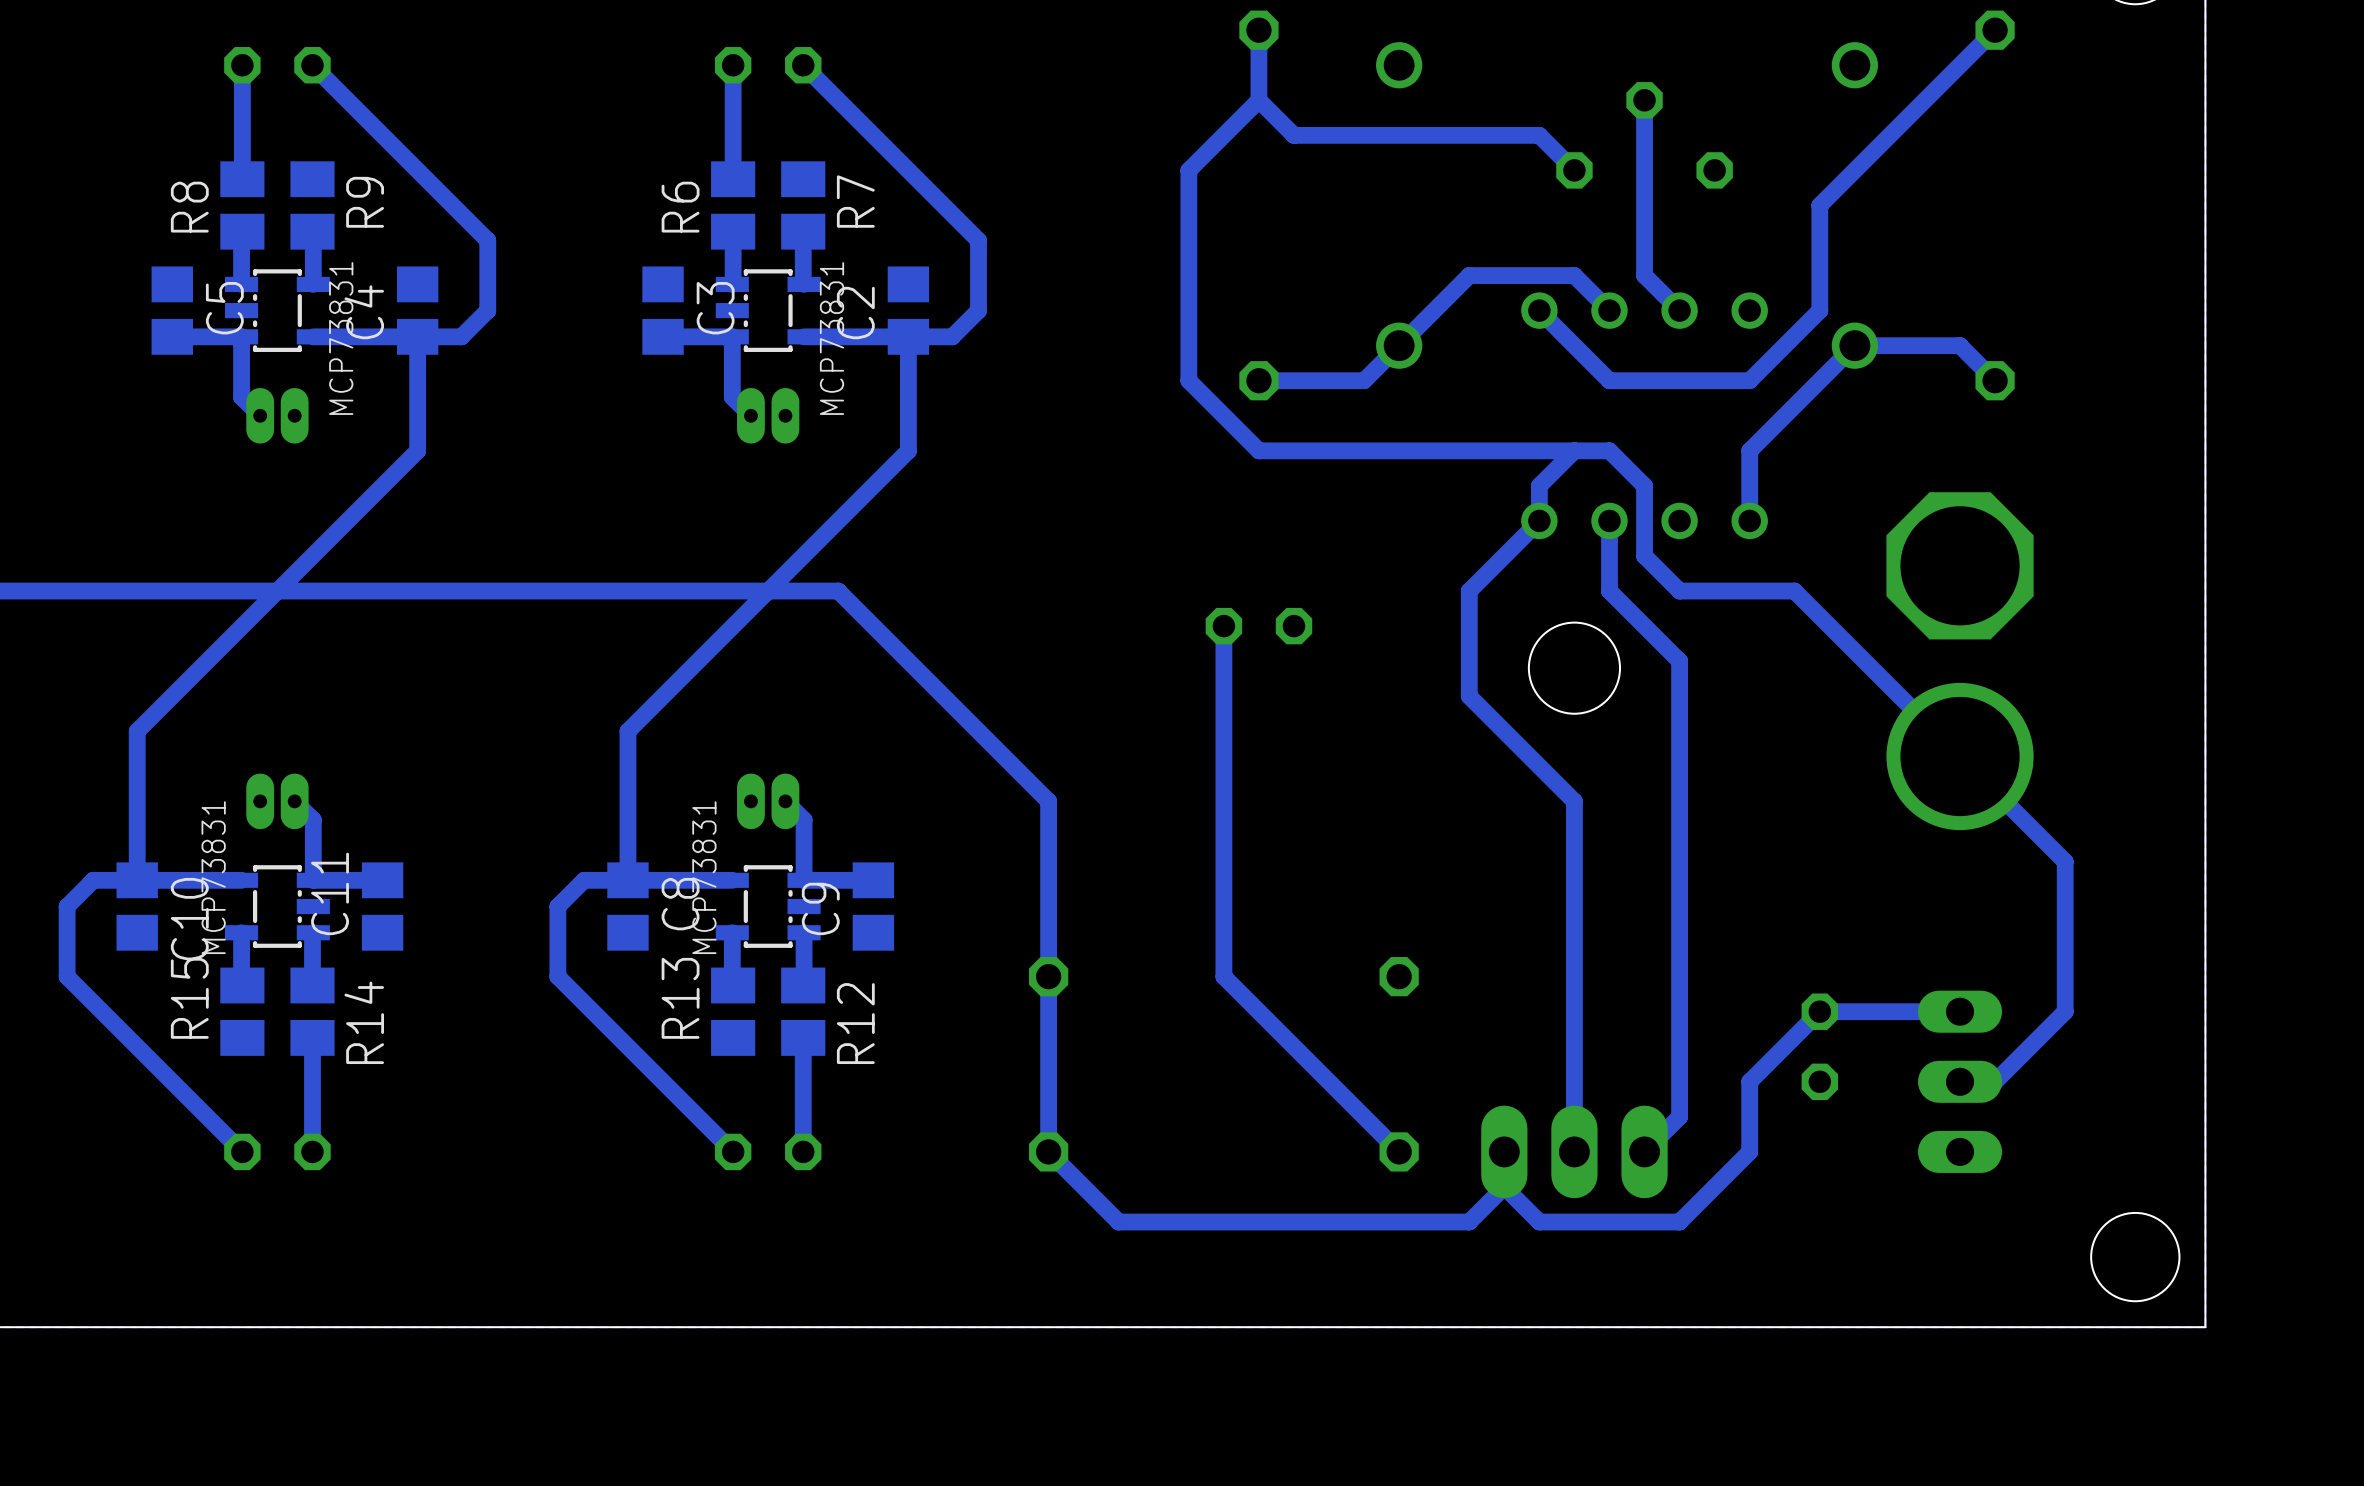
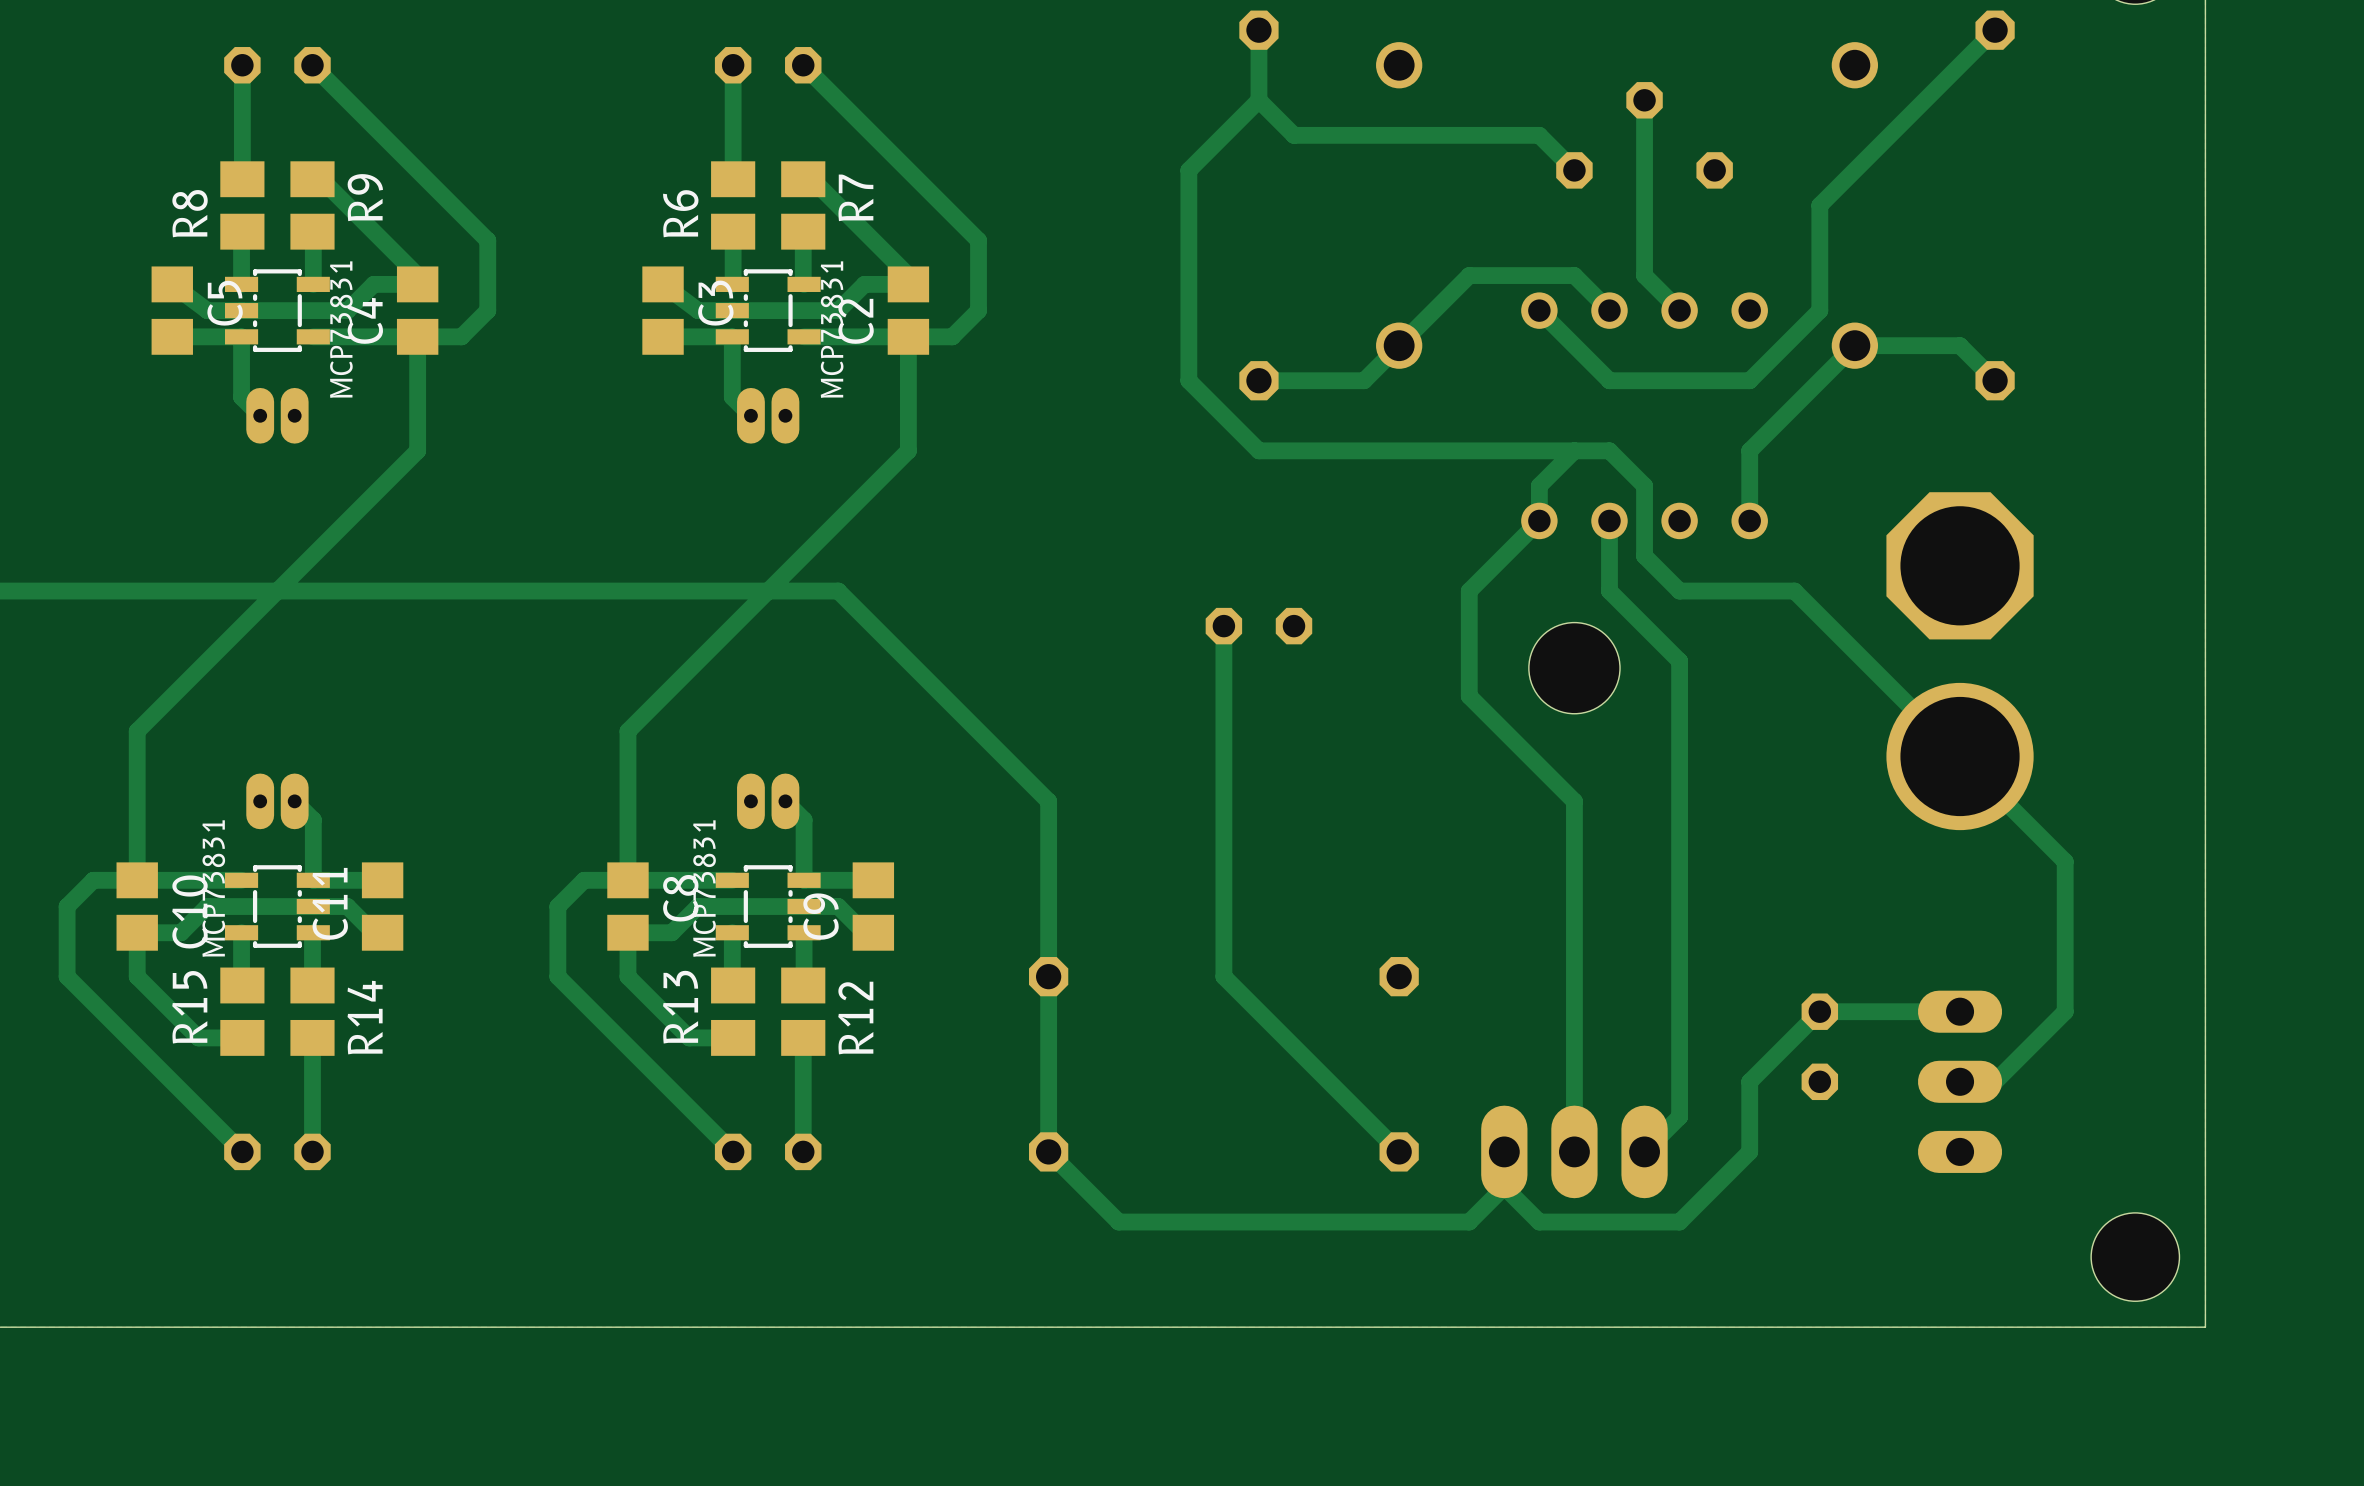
track: none -> (312, 179) (321, 179) (417, 275) (417, 284) (373, 284) (347, 310) (207, 310) (172, 284)
track: none -> (803, 179) (812, 179) (908, 275) (908, 284) (864, 284) (838, 310) (698, 310) (663, 284)
track: none -> (382, 932) (373, 932) (347, 906) (207, 906) (181, 932) (137, 932) (137, 976) (198, 1037) (242, 1037)
track: none -> (873, 932) (864, 932) (838, 906) (698, 906) (671, 932) (627, 932) (627, 976) (689, 1037) (733, 1037)

